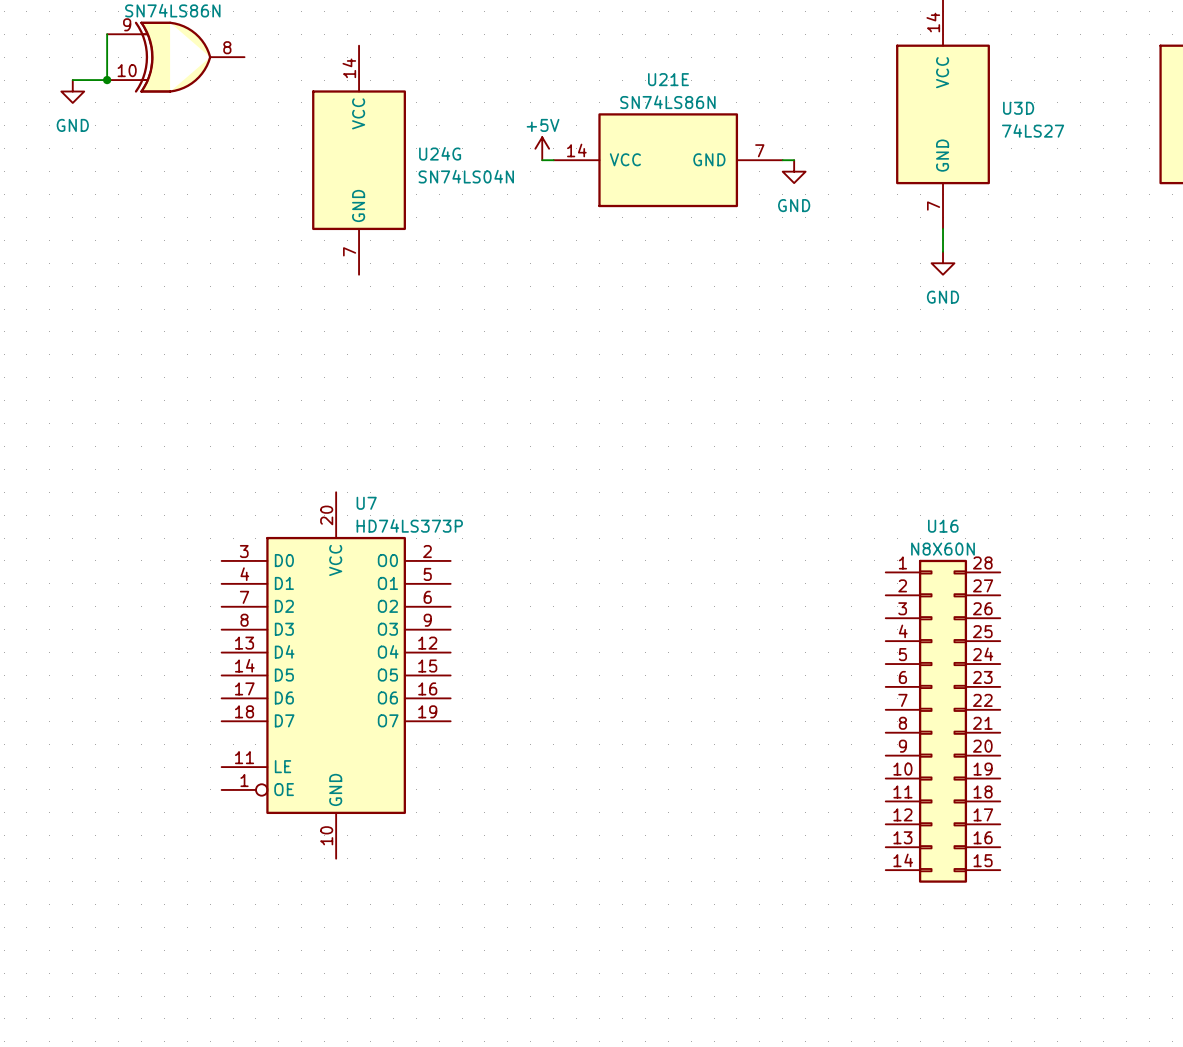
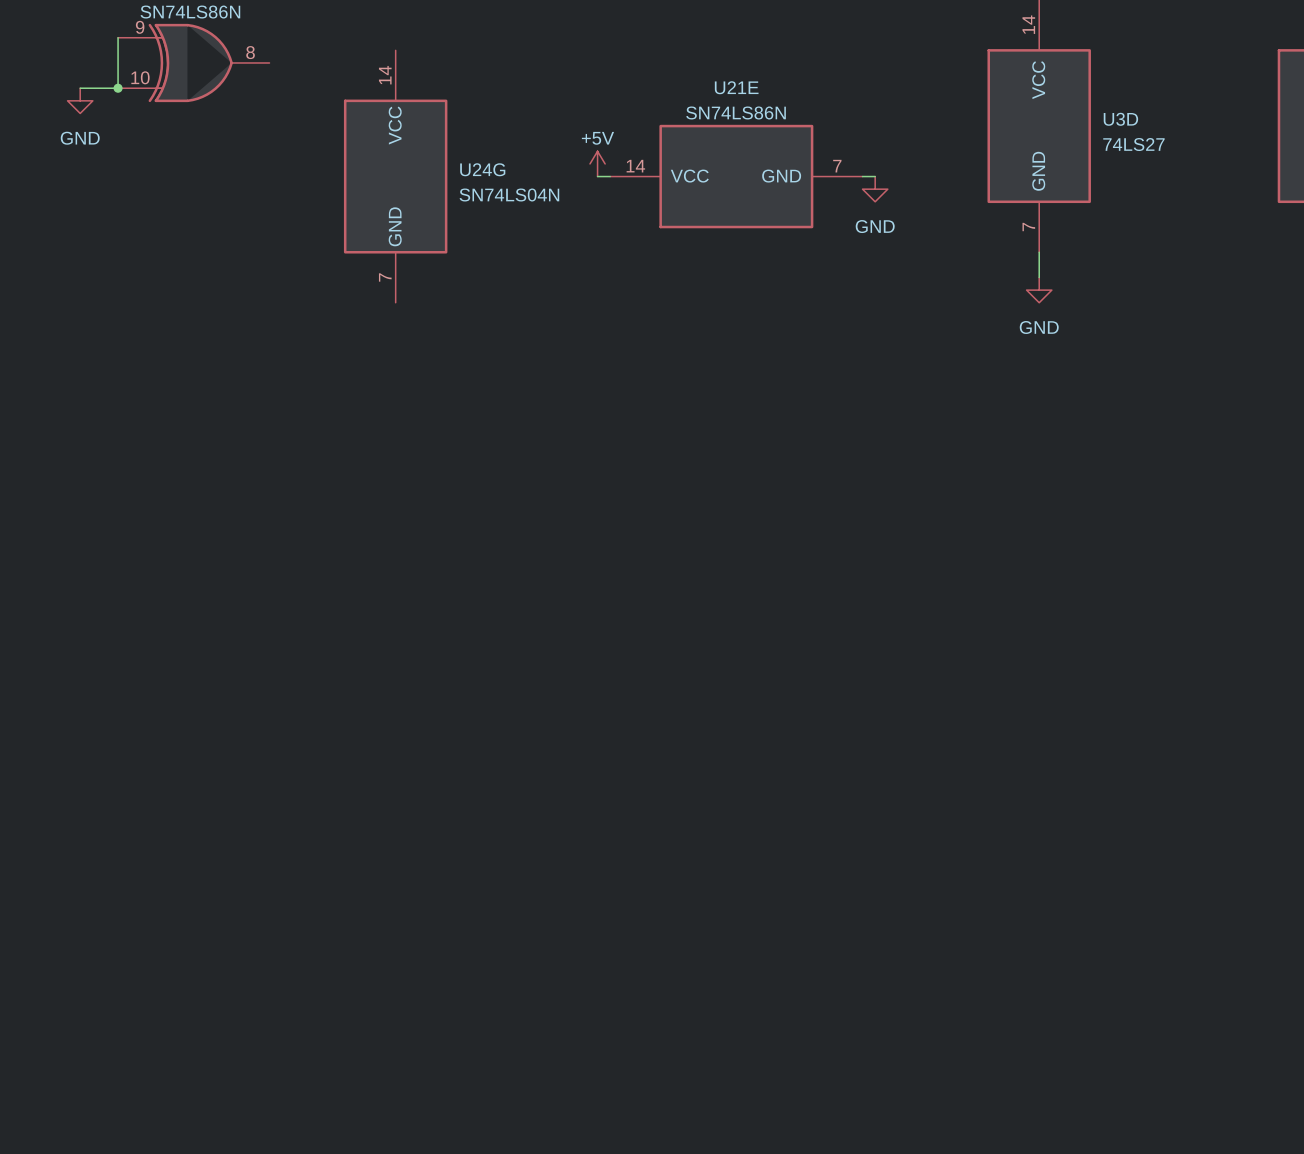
U7: HD74LS373P (336, 675) -> none
U16: N8X60N (943, 721) -> none

